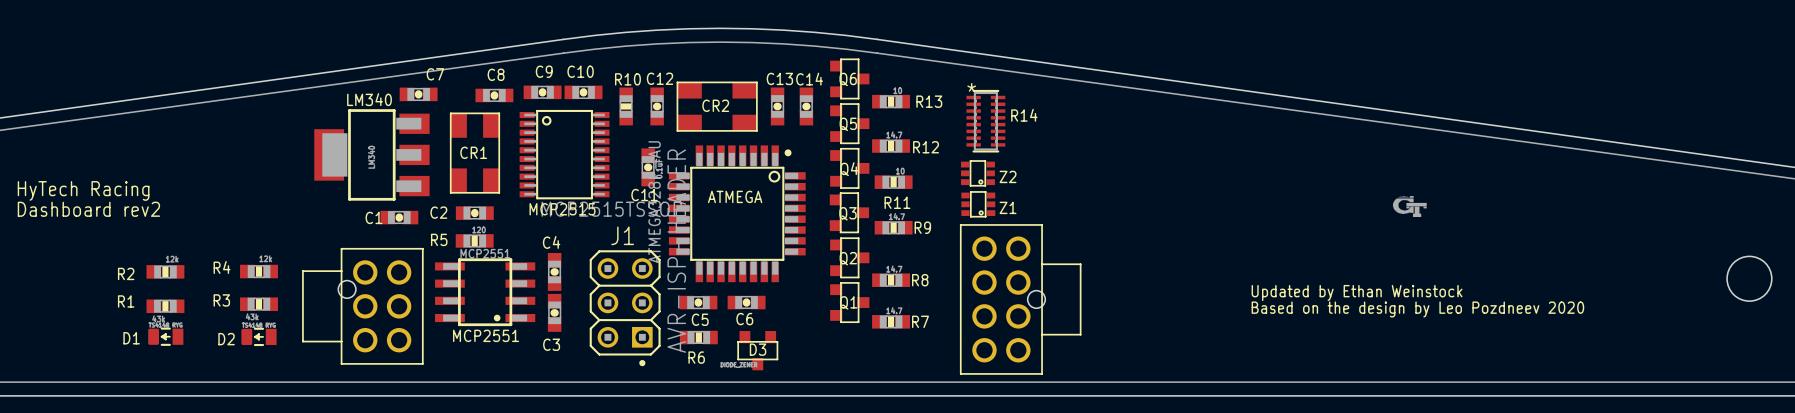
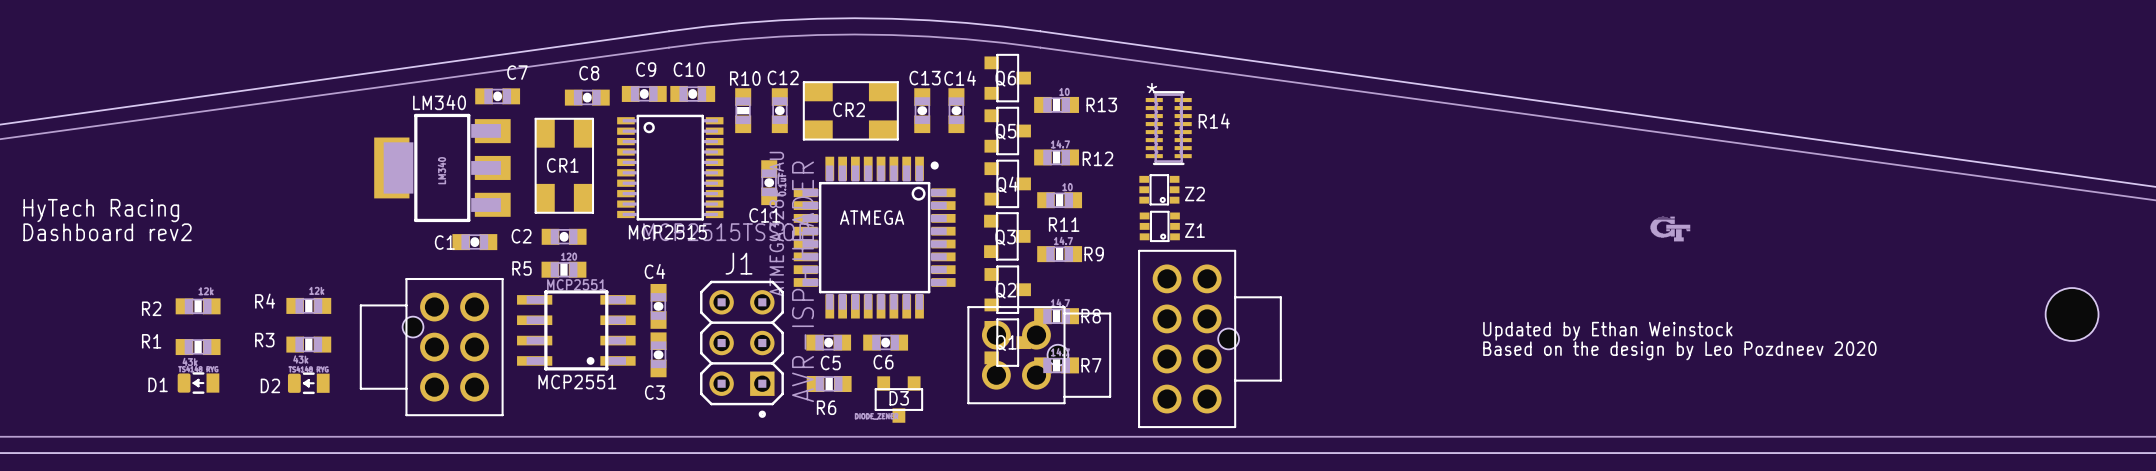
part: none -> (1039, 355)

